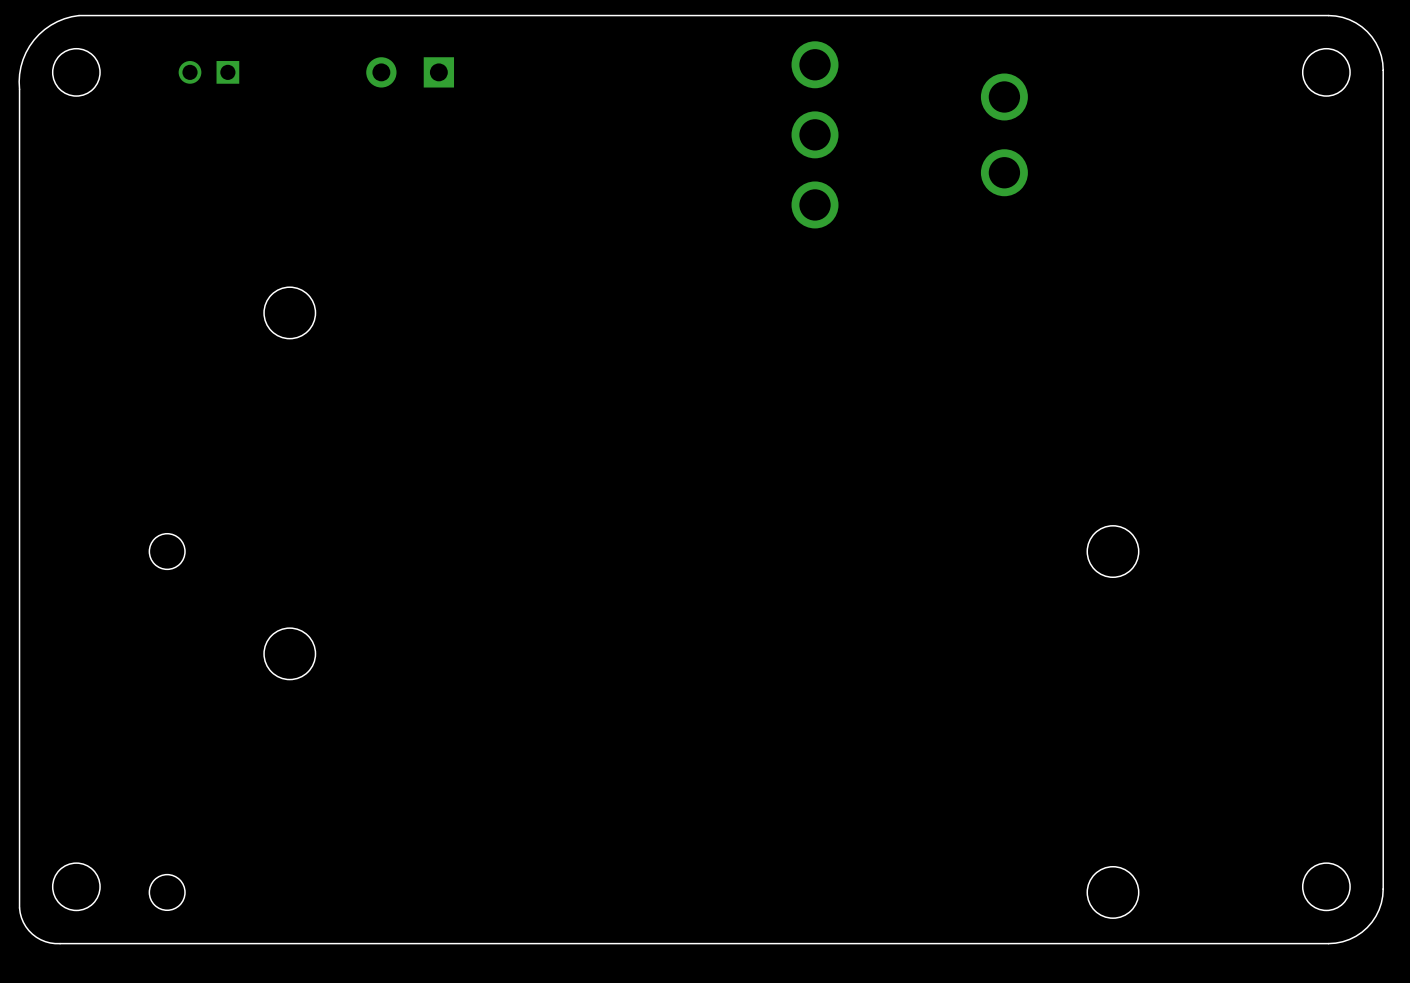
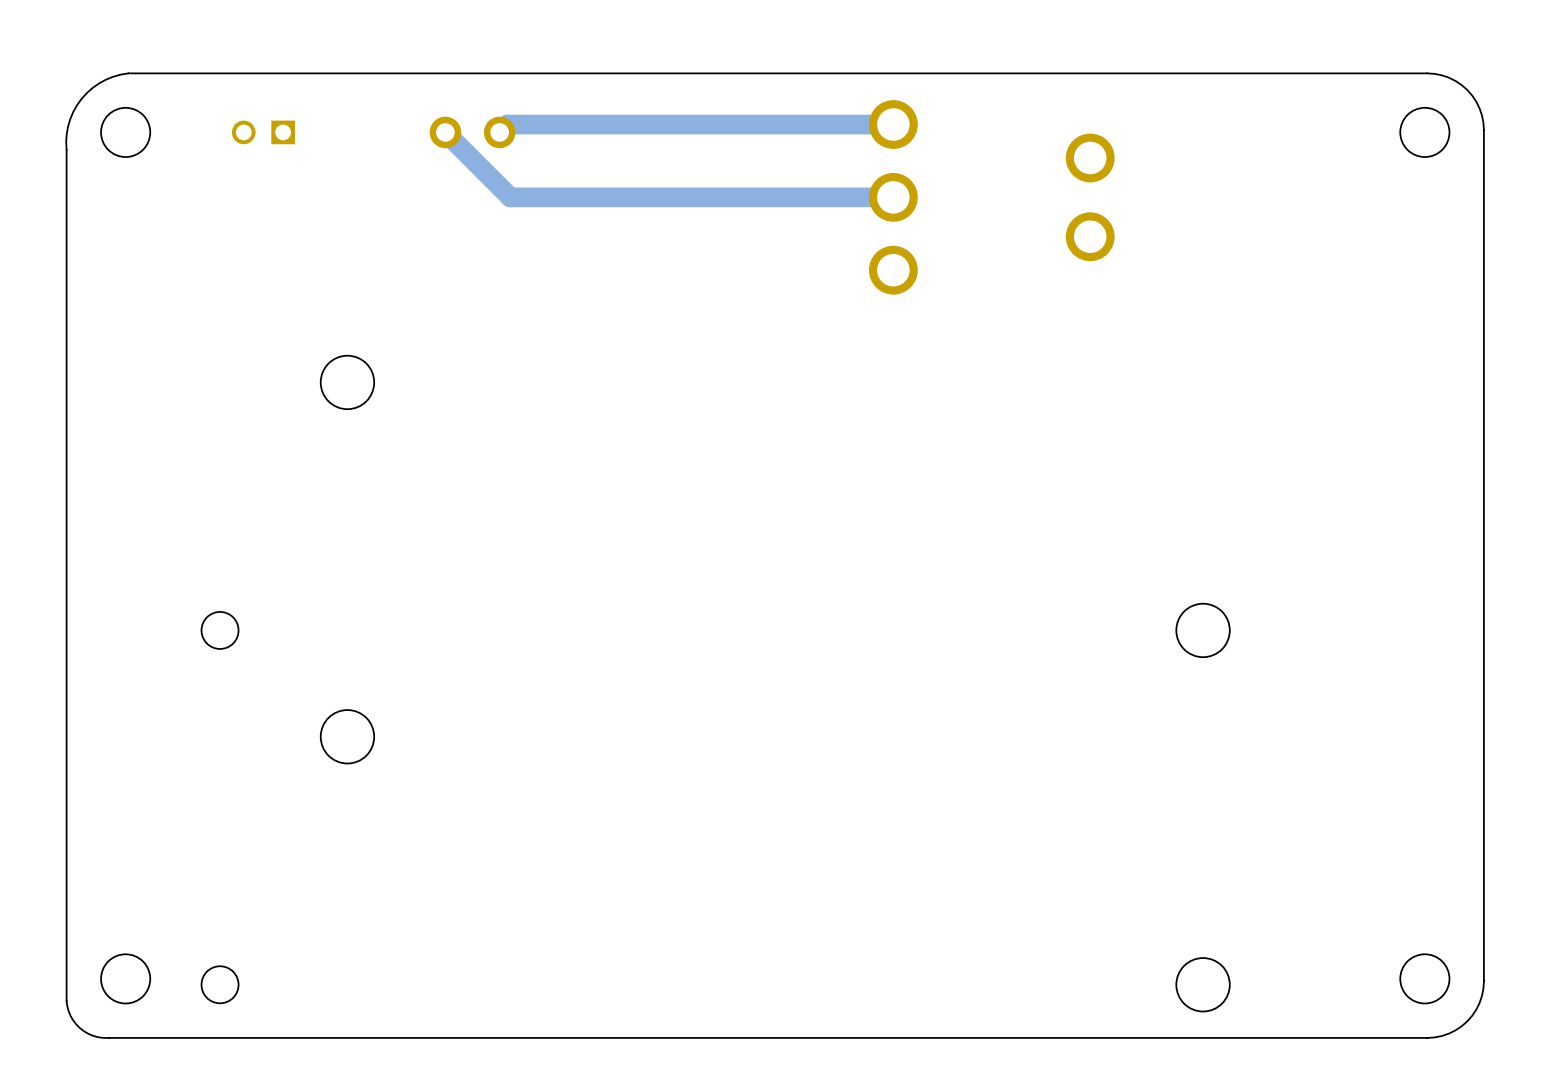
part footprint: [366, 57, 455, 88] -> [429, 116, 516, 149]
track: none -> (893, 124) (507, 124) (499, 132)
track: none -> (445, 132) (510, 197) (893, 197)

